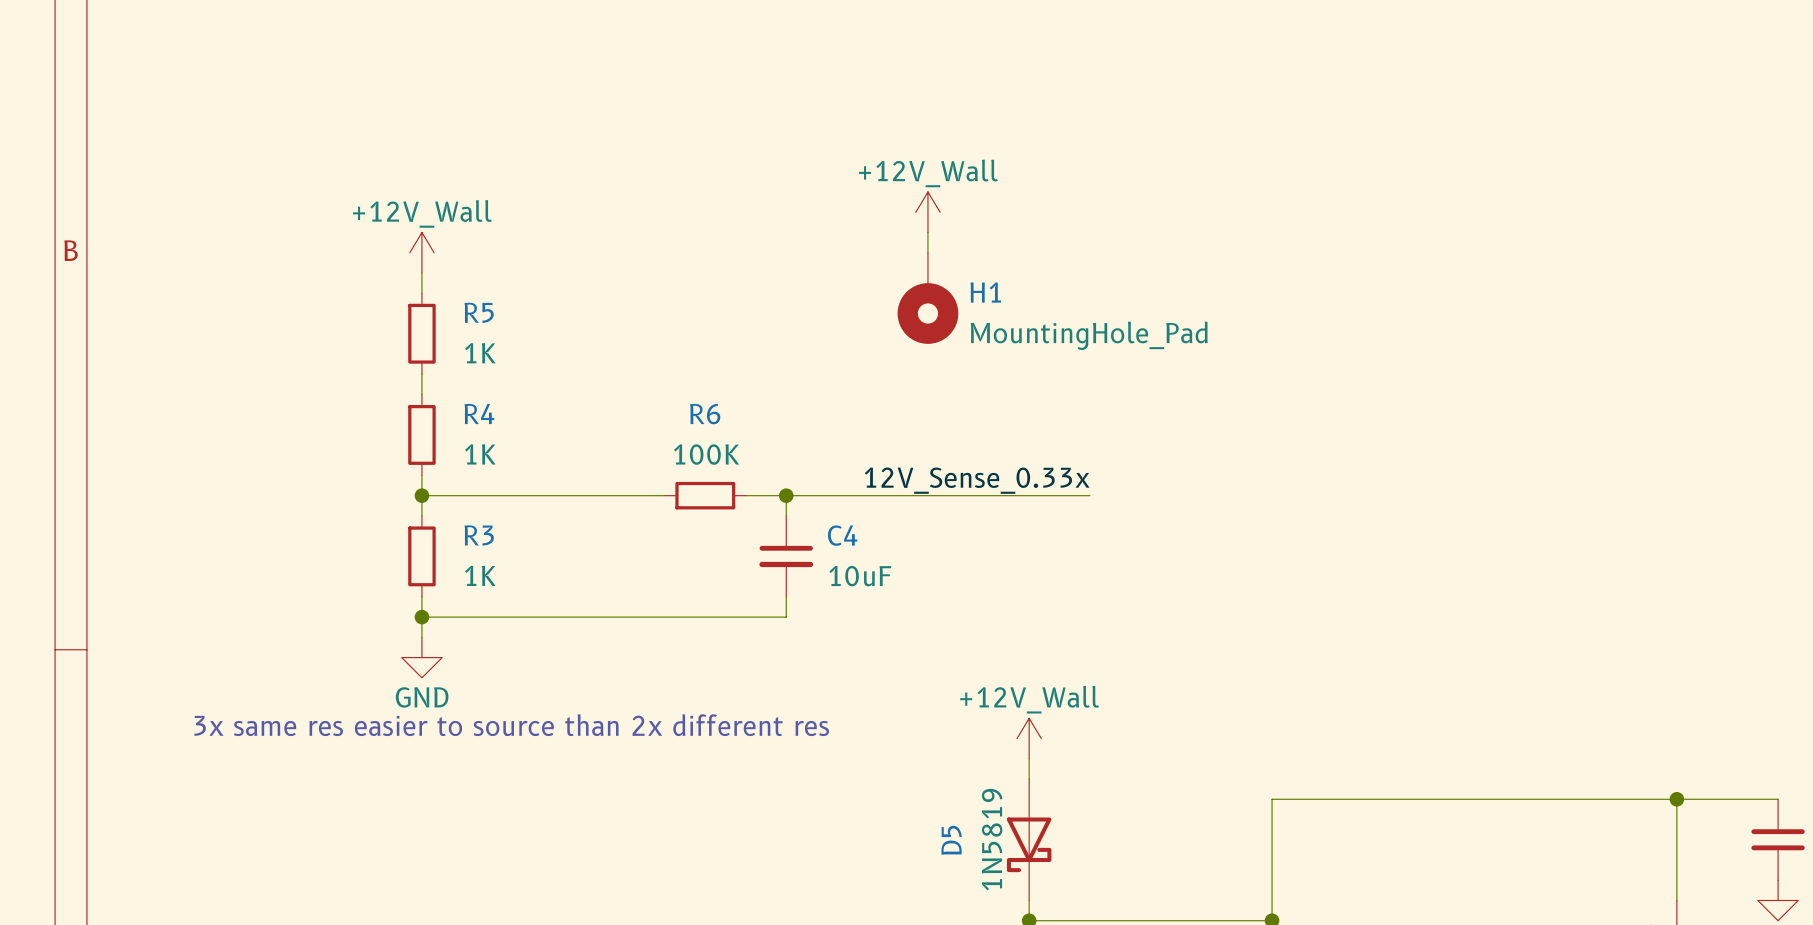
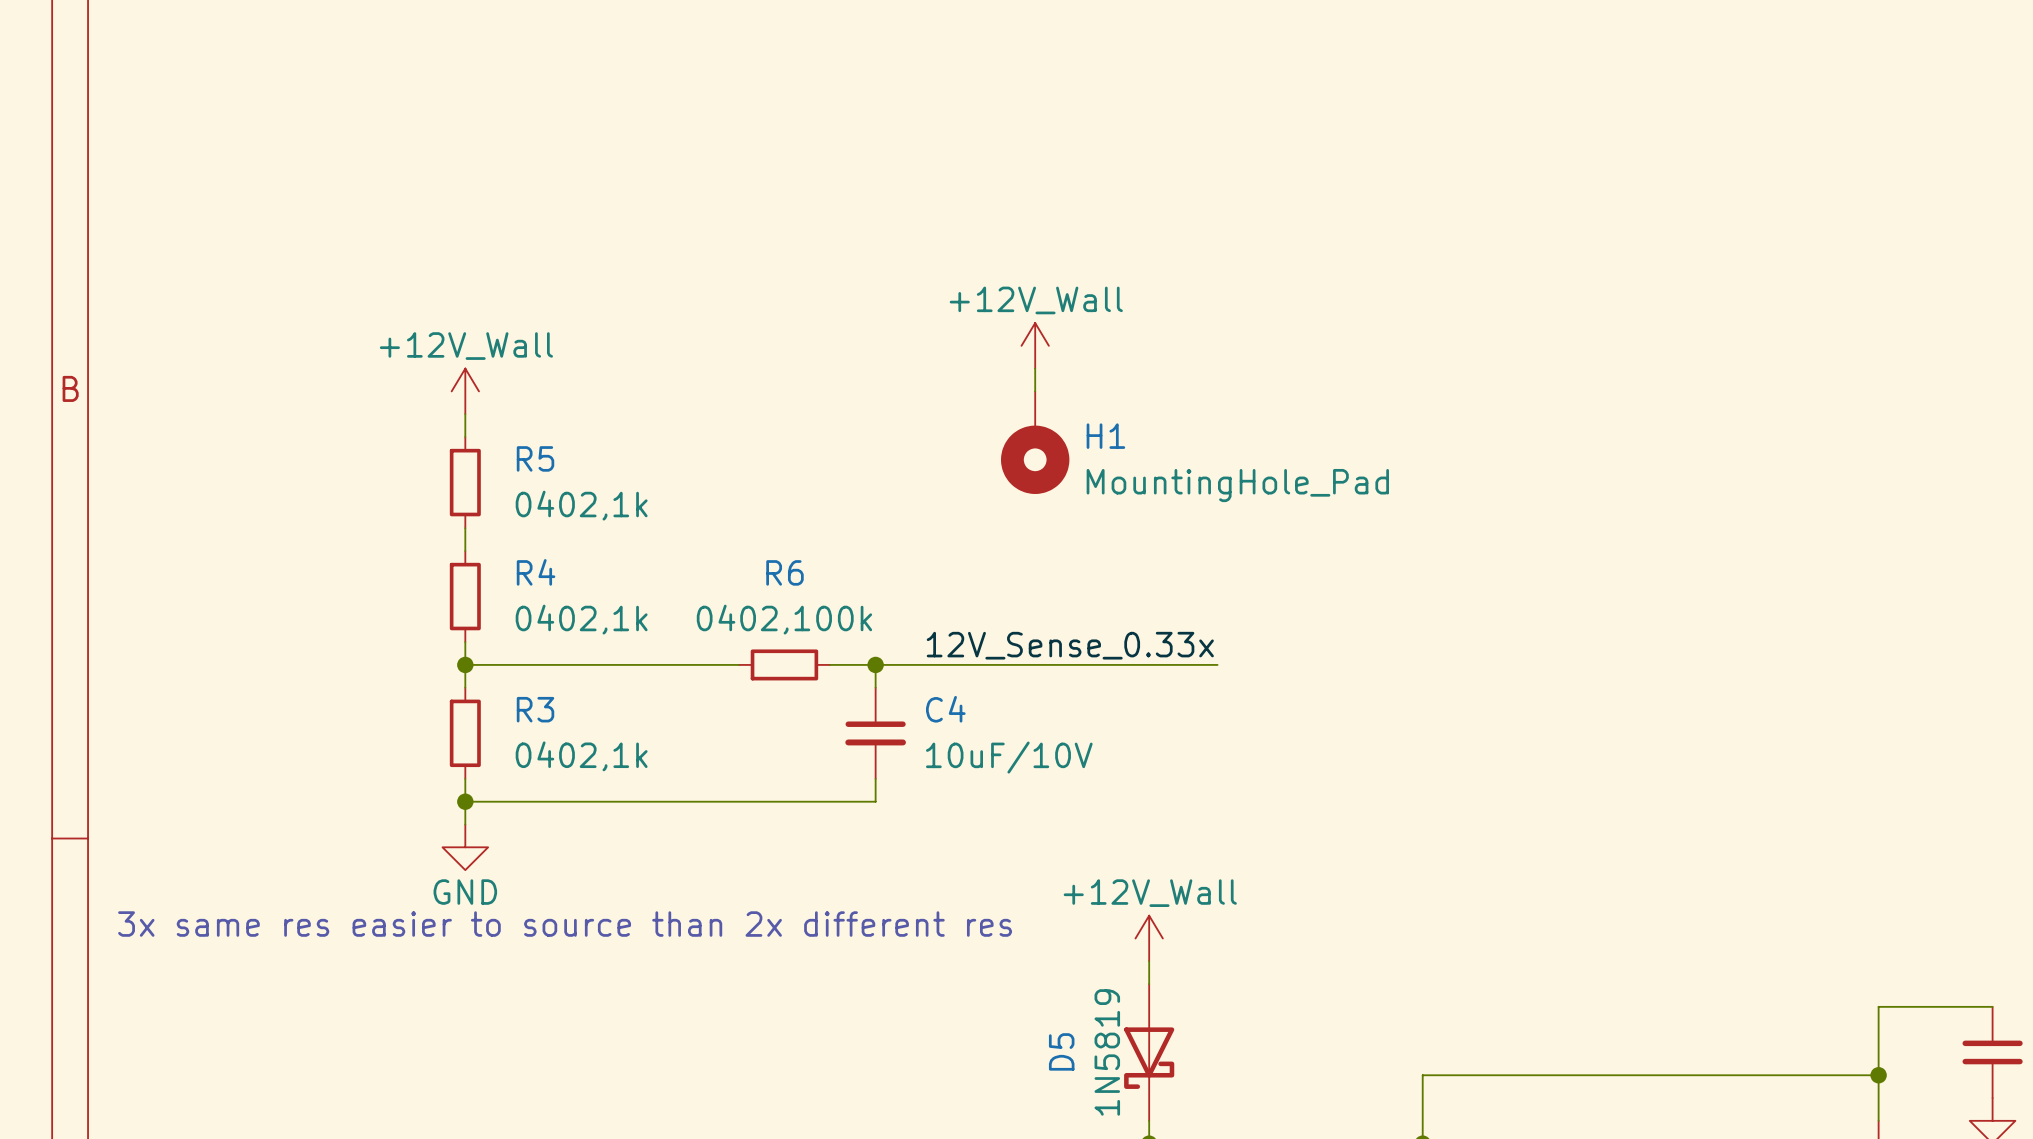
R5 value: 1K (480, 353) -> 0402,1k (581, 505)
R4 value: 1K (480, 454) -> 0402,1k (581, 619)
R6 value: 100K (706, 454) -> 0402,100k (784, 619)
R3 value: 1K (480, 575) -> 0402,1k (581, 756)
C4 value: 10uF (860, 576) -> 10uF/10V (1009, 757)
wire: (1676, 799) (1272, 799) (1272, 860) -> (1878, 1075) (1422, 1075)
junction position: (1676, 799) -> (1878, 1075)

